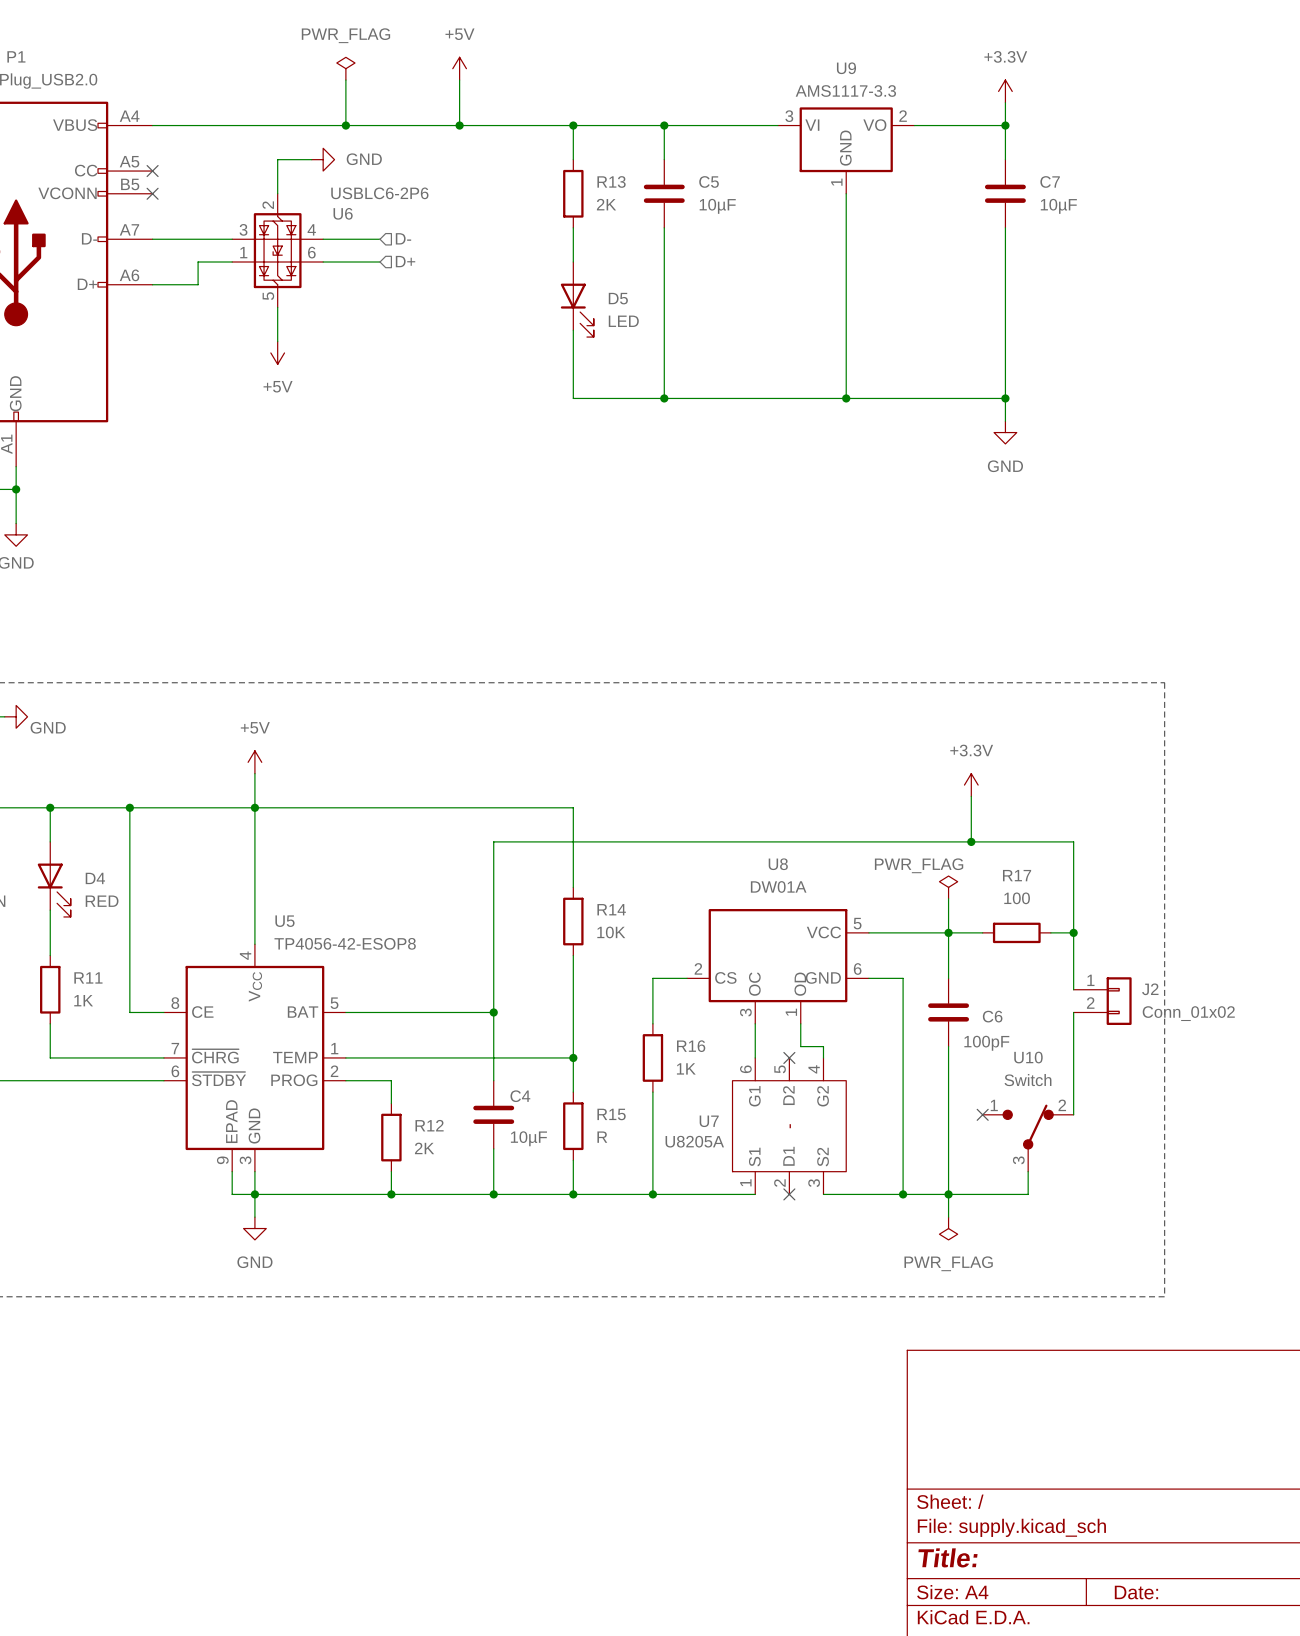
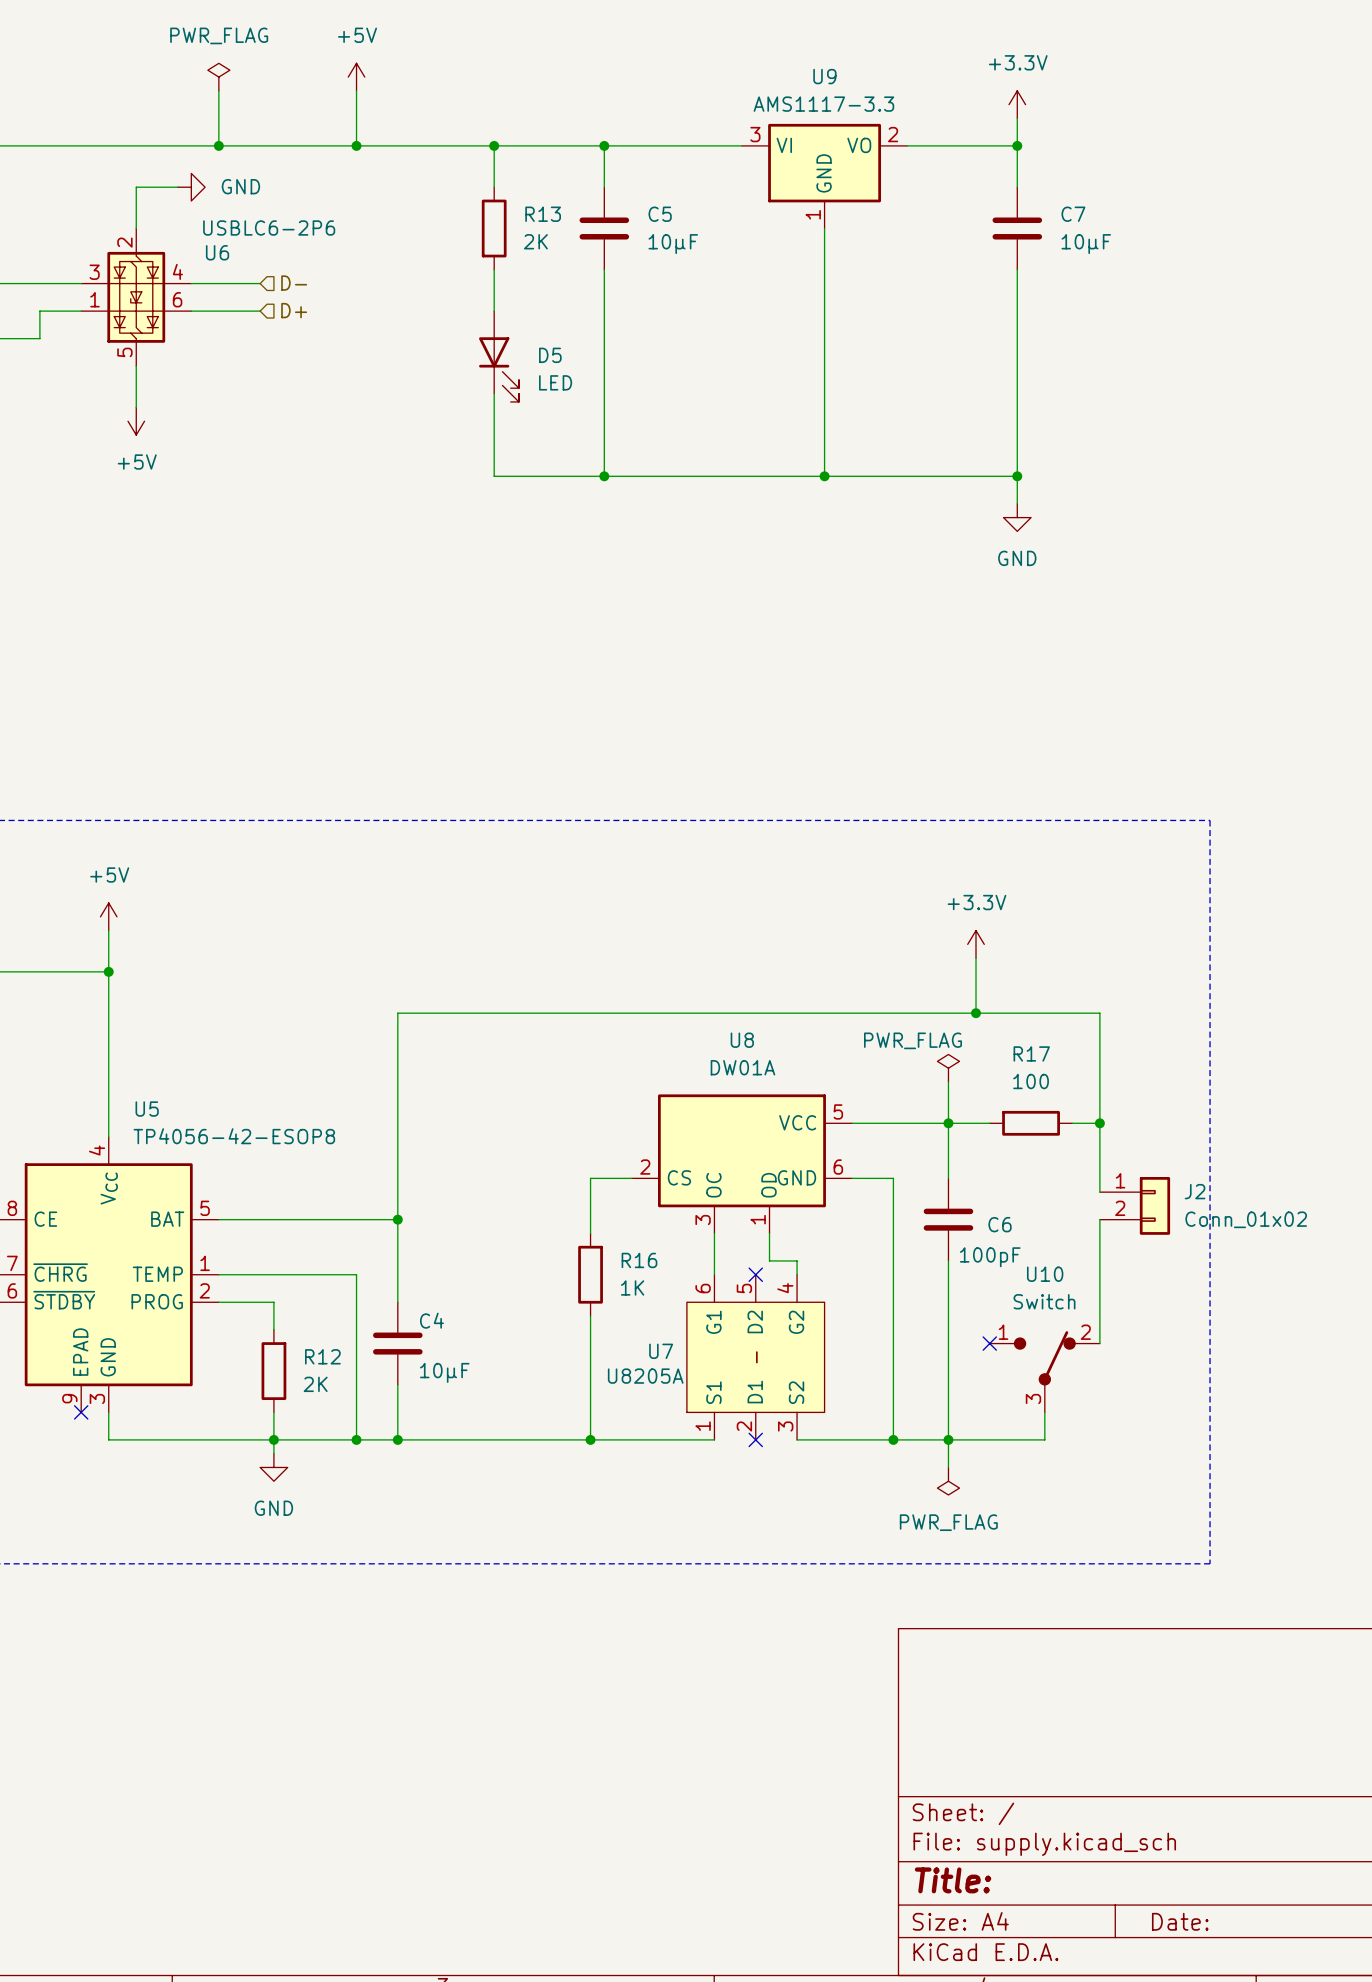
wire: (254, 807) (573, 807) (573, 887) -> none
R14: 10K (573, 921) -> none
wire: (573, 955) (573, 1092) -> none
wire: (459, 1057) (573, 1057) -> (356, 1274) (356, 1439)
junction: (573, 1057) -> none
R15: R (573, 1126) -> none
wire: (573, 1160) (573, 1194) -> none
wire: (232, 1171) (232, 1194) (254, 1194) (254, 1217) -> none
no-connect mark: none -> (81, 1412)
junction: (254, 1194) -> none
wire: none -> (273, 1439) (273, 1453)
junction: none -> (356, 1439)
junction: (573, 1194) -> none
power symbol position: GND (254, 1228) -> GND (273, 1467)

